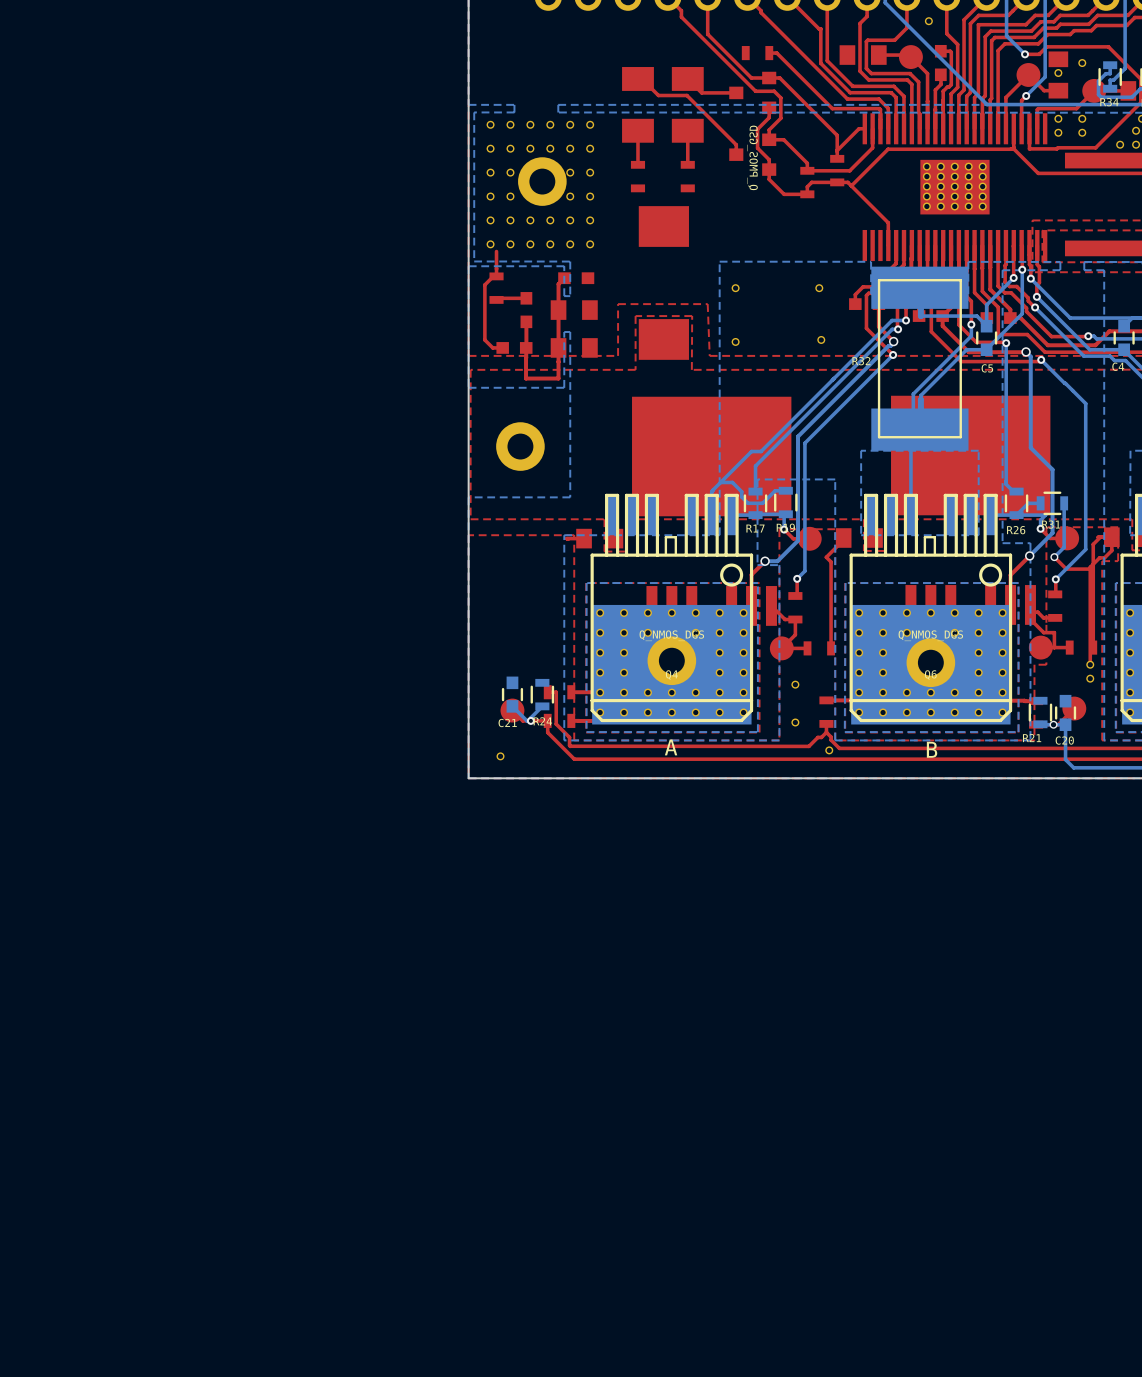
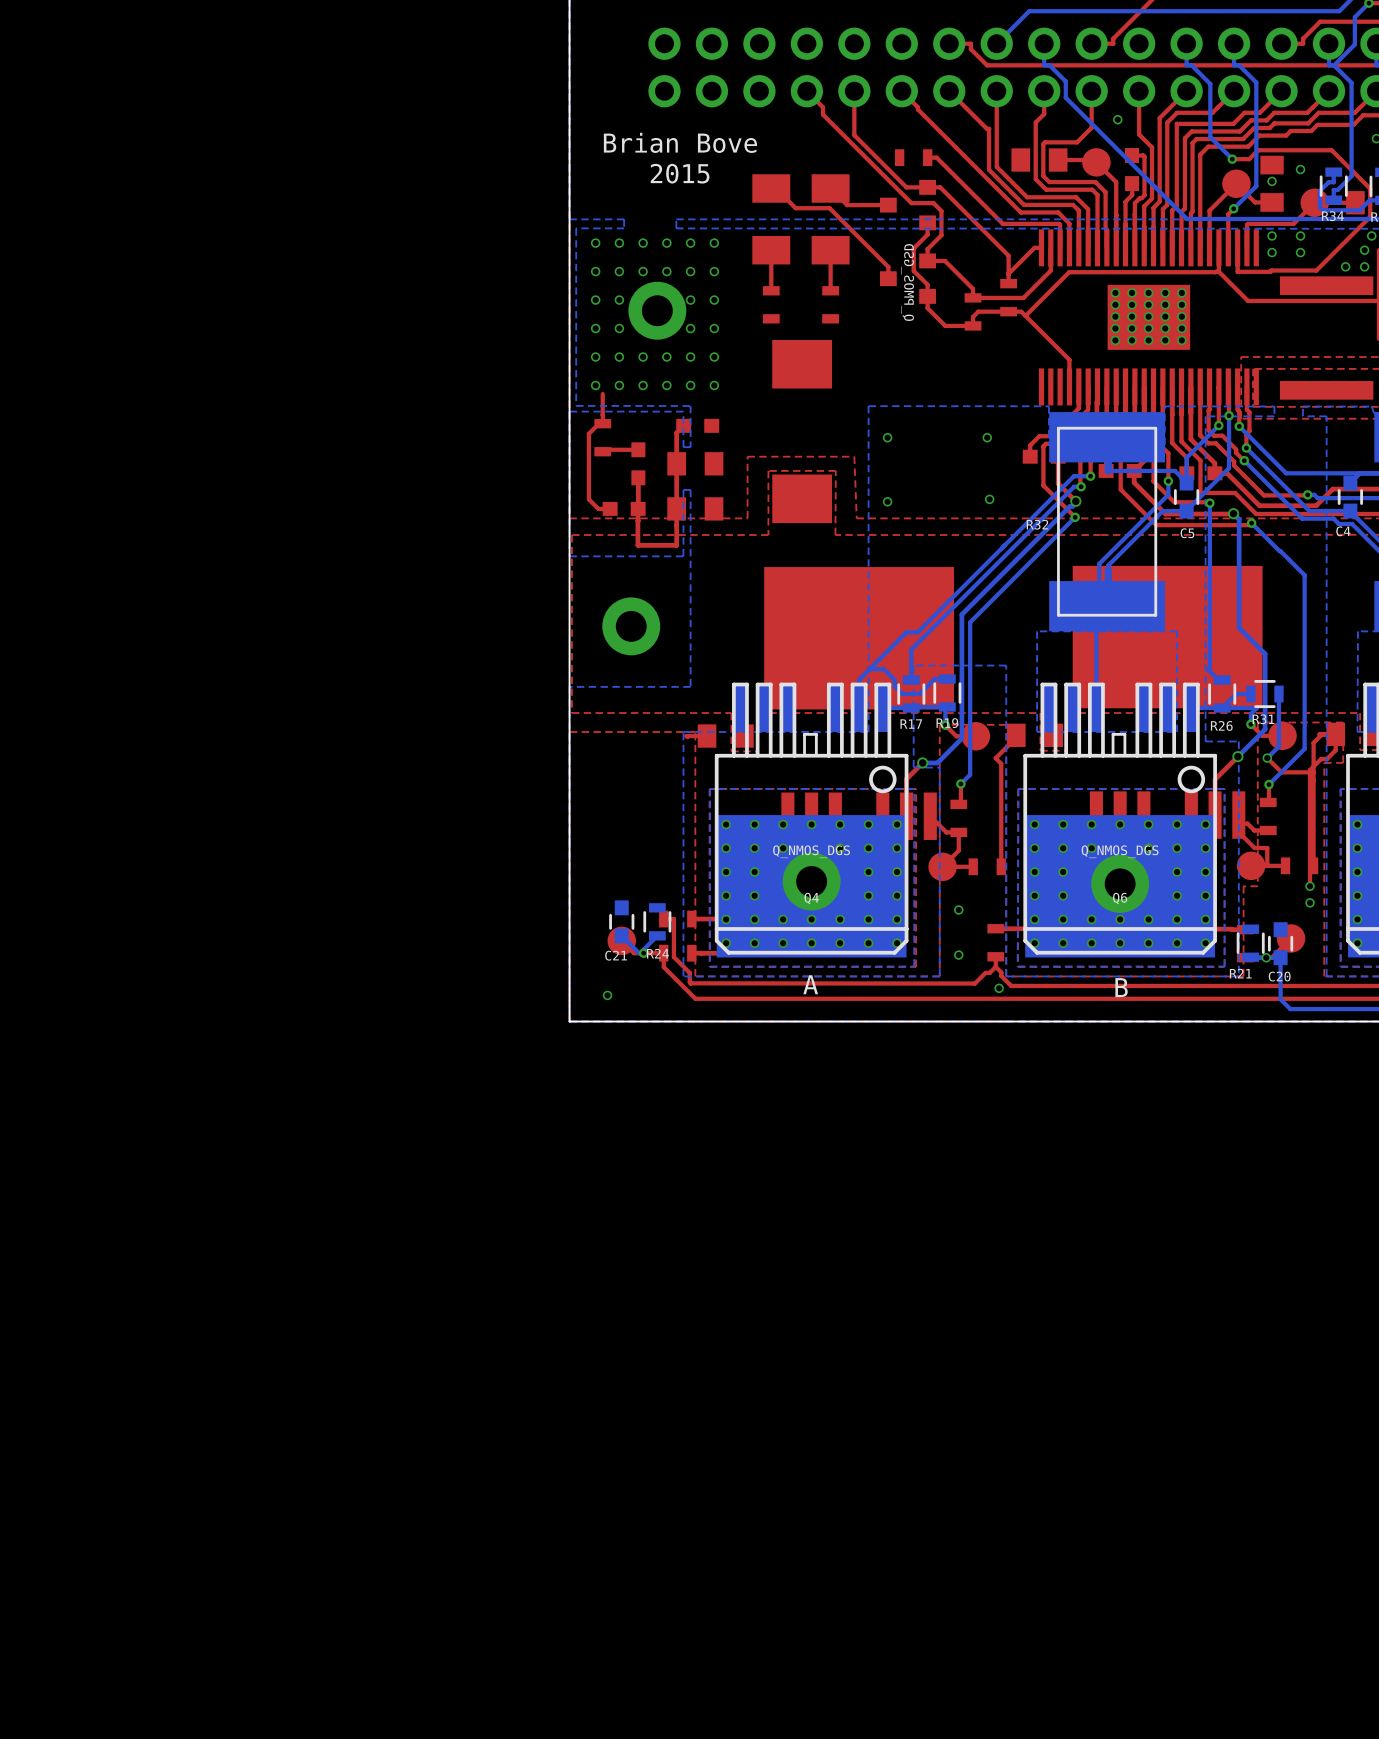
text: none -> Brian Bove (680, 142)
text: none -> 2015 (680, 173)

